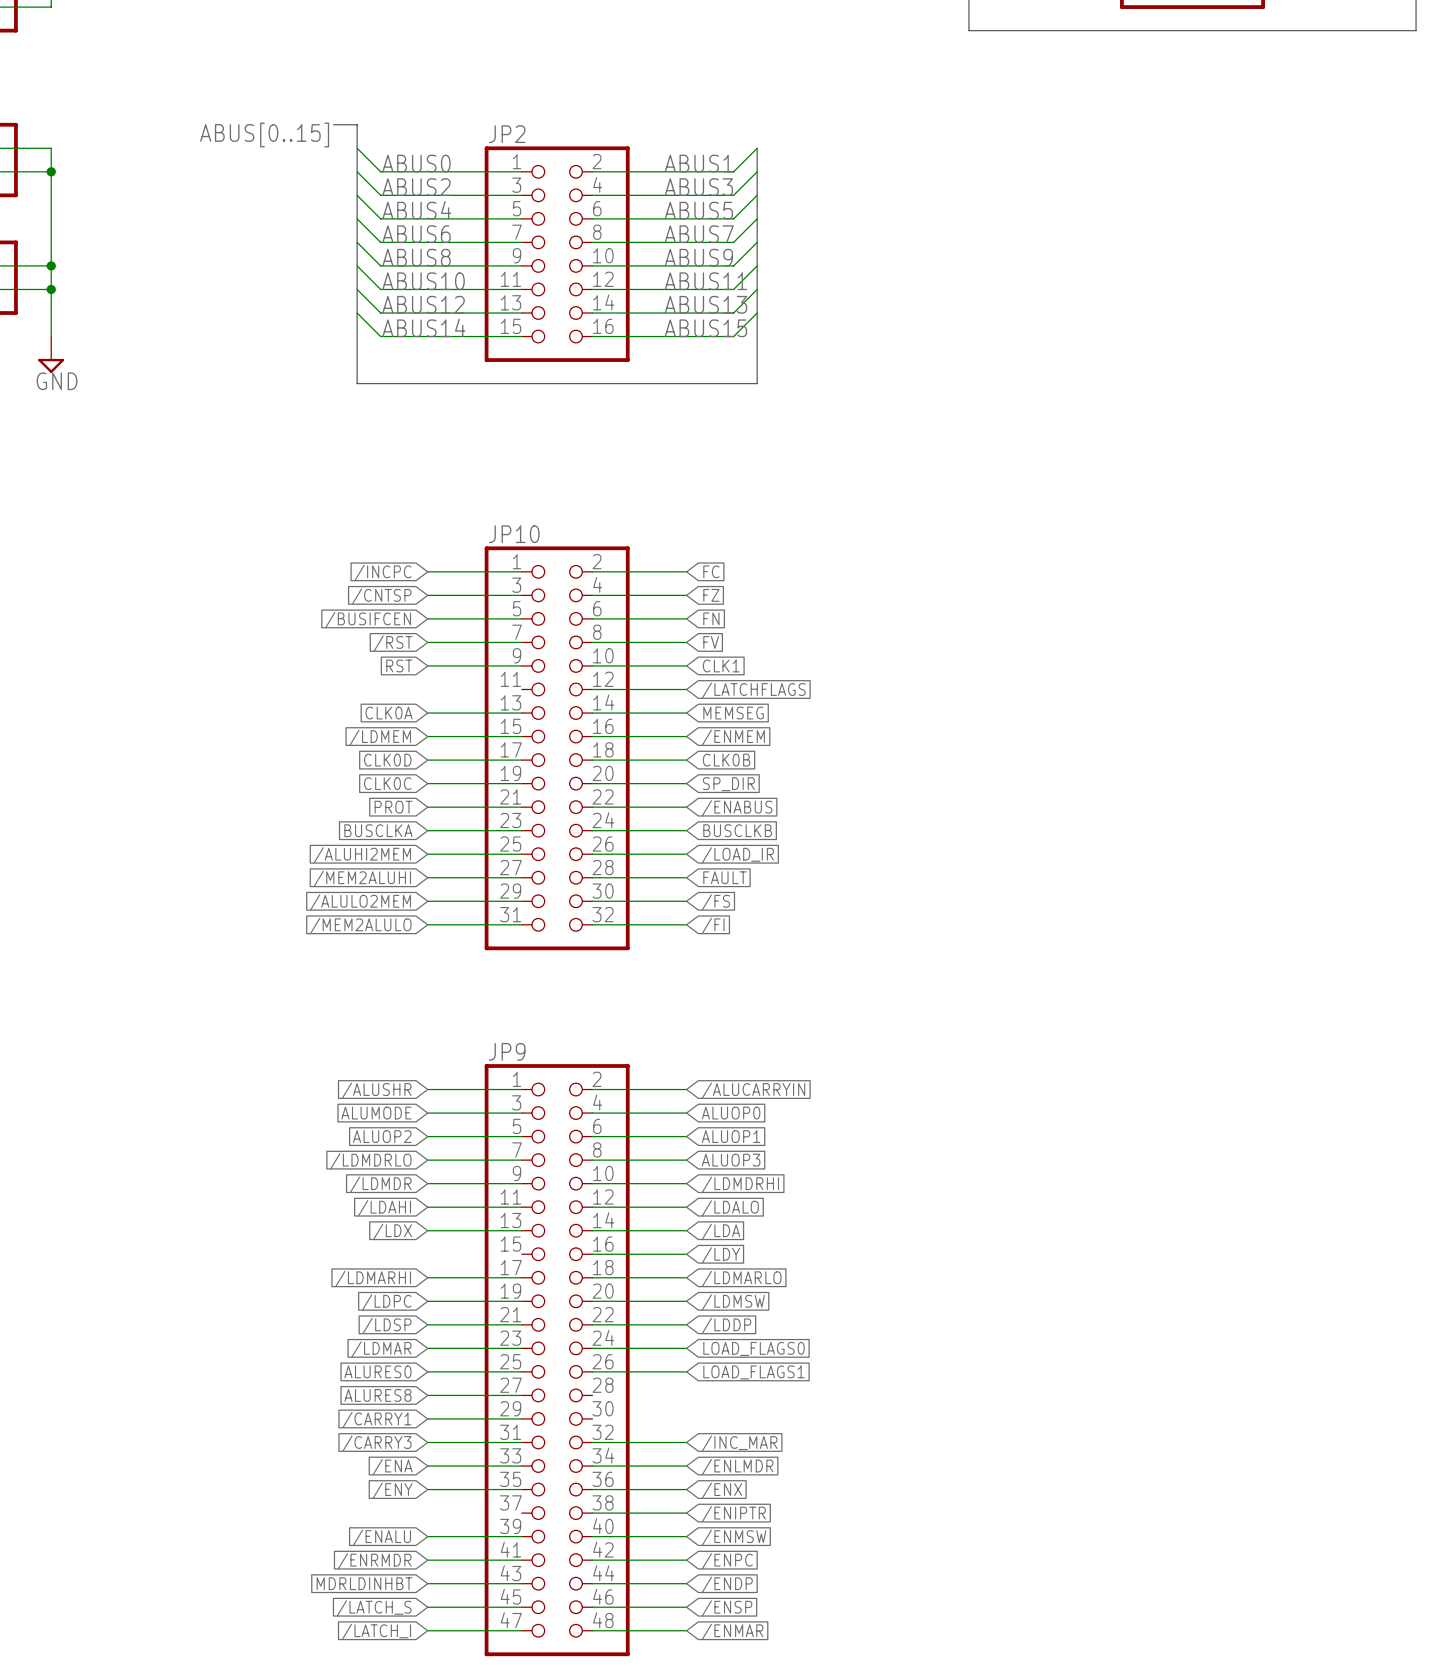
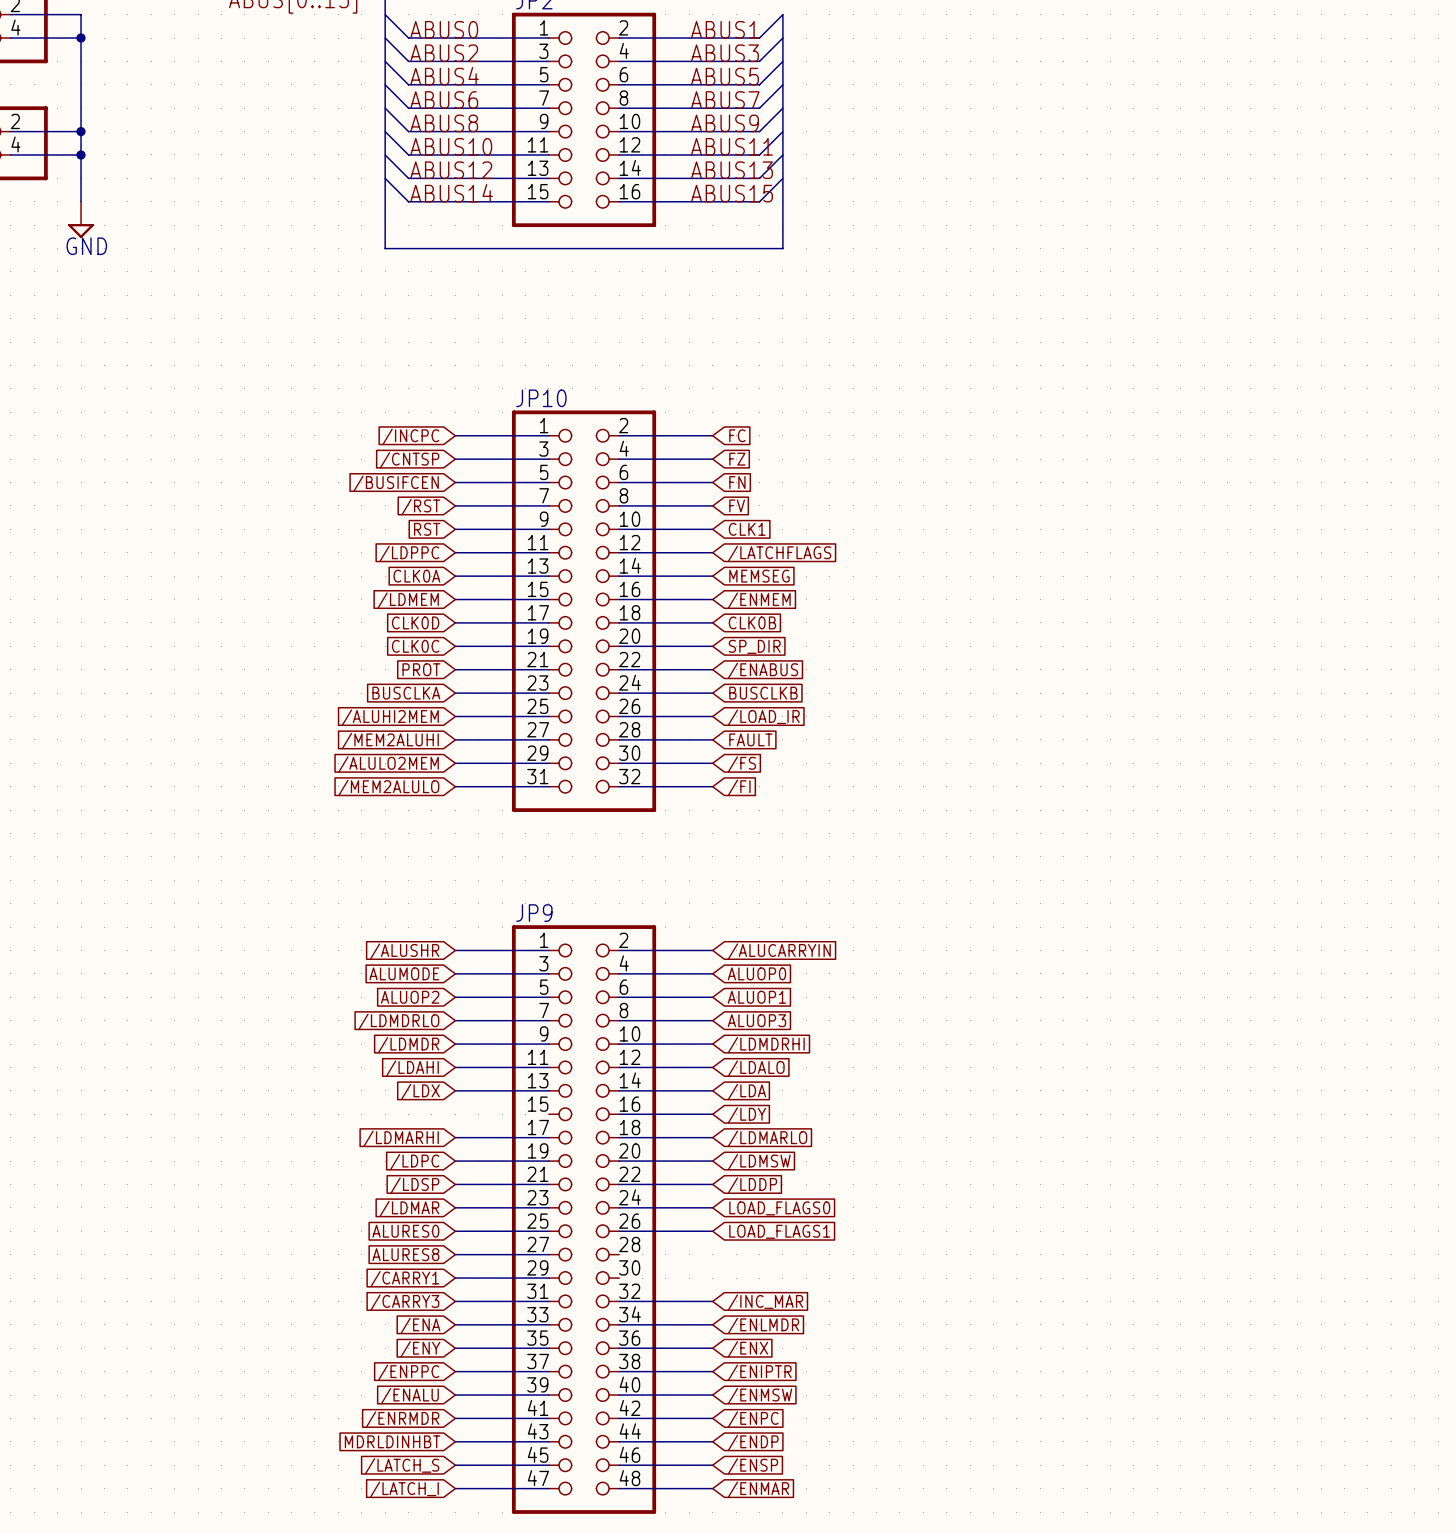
wire: none -> (455, 552) (548, 552)
global label: none -> /LDPPC (409, 553)
wire: none -> (455, 1371) (548, 1371)
global label: none -> /ENPPC (408, 1372)

